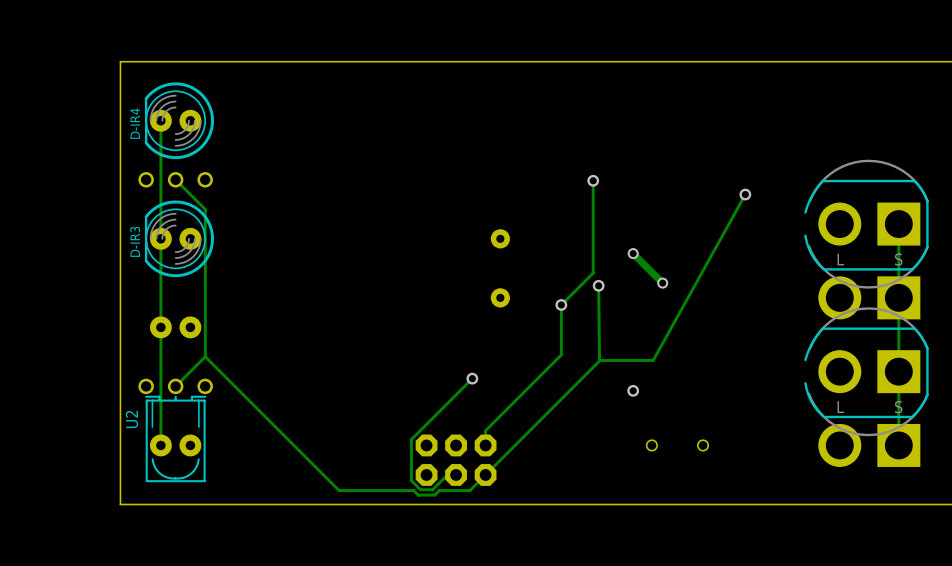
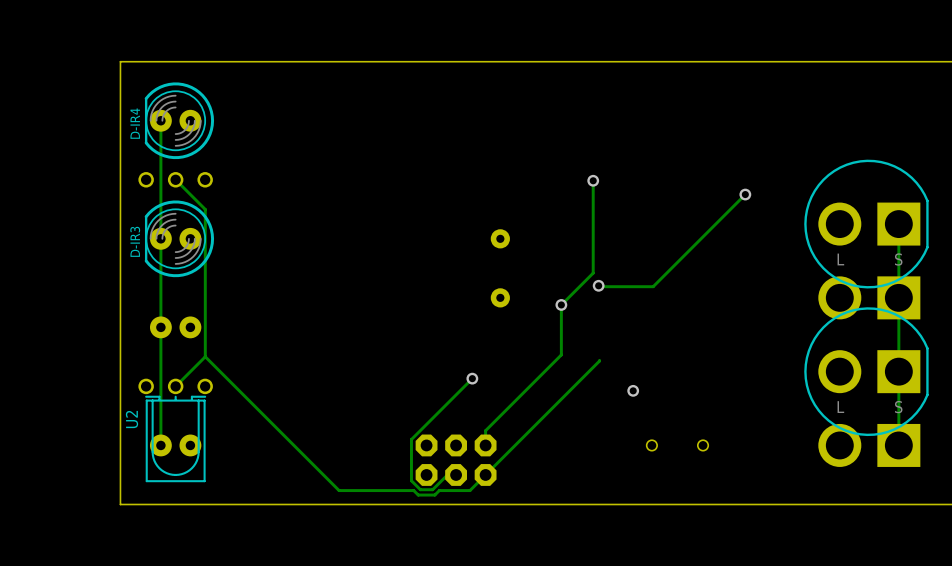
part footprint: [804, 159, 929, 289] -> [804, 159, 929, 289]
track: (745, 194) (653, 360) (599, 360) (598, 285) -> (745, 194) (653, 286) (599, 286)
track: (633, 253) (662, 283) -> none
via: (633, 253) -> none
via: (662, 283) -> none
part footprint: [804, 307, 929, 437] -> [804, 307, 929, 437]
U2 footprint: [138, 378, 213, 483] -> [138, 378, 213, 483]

